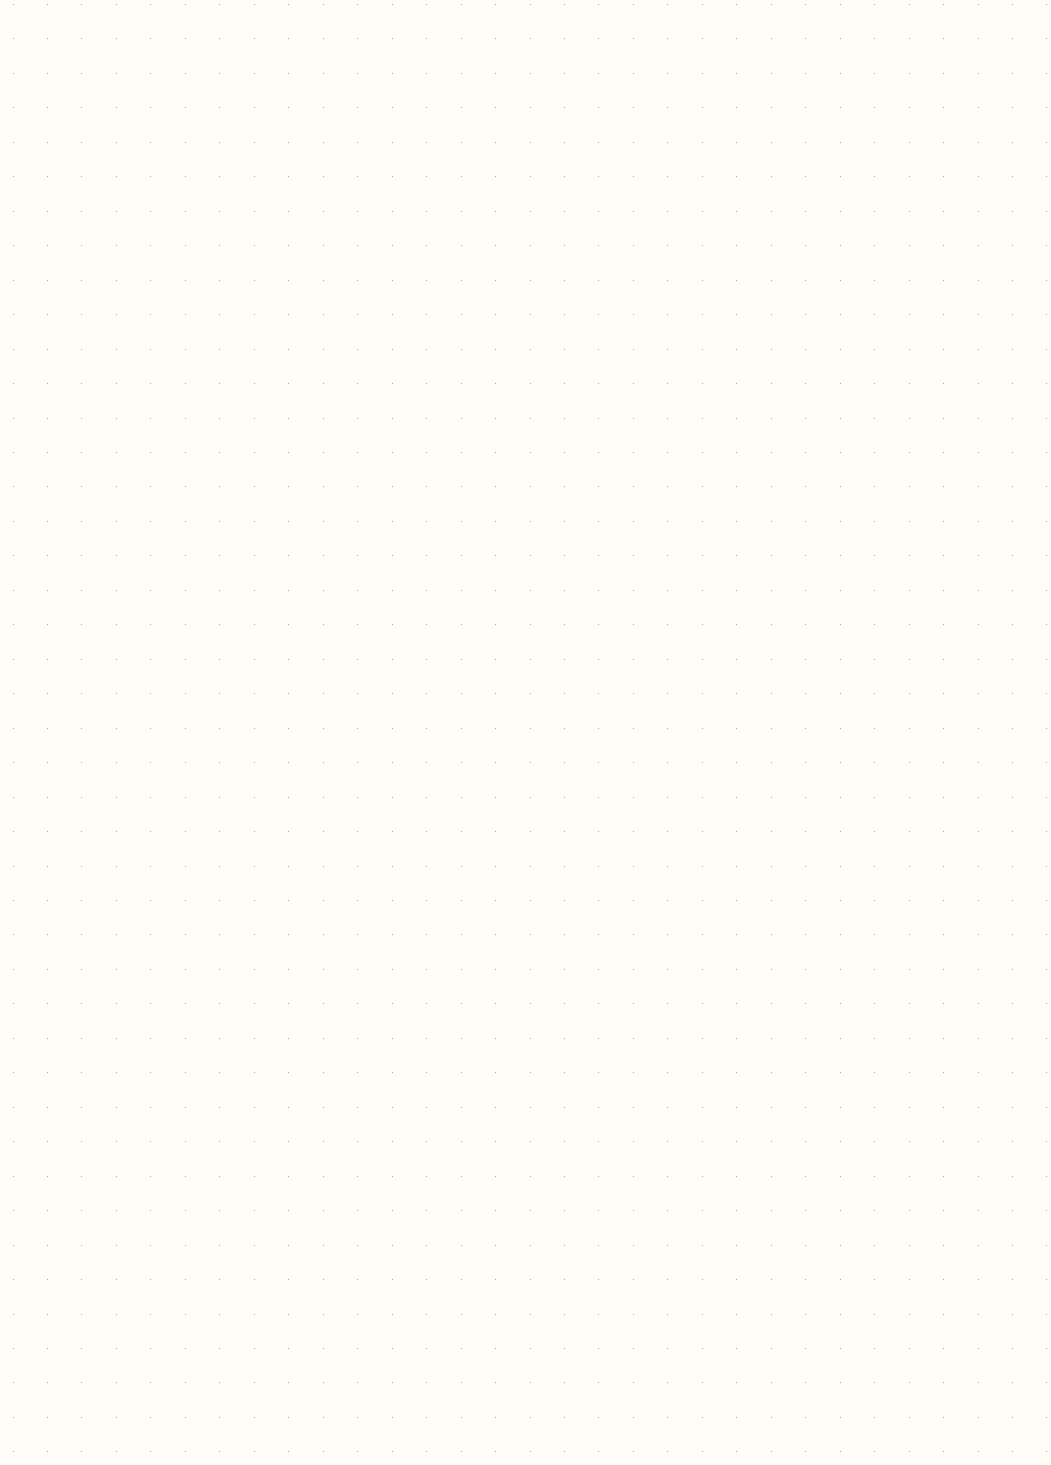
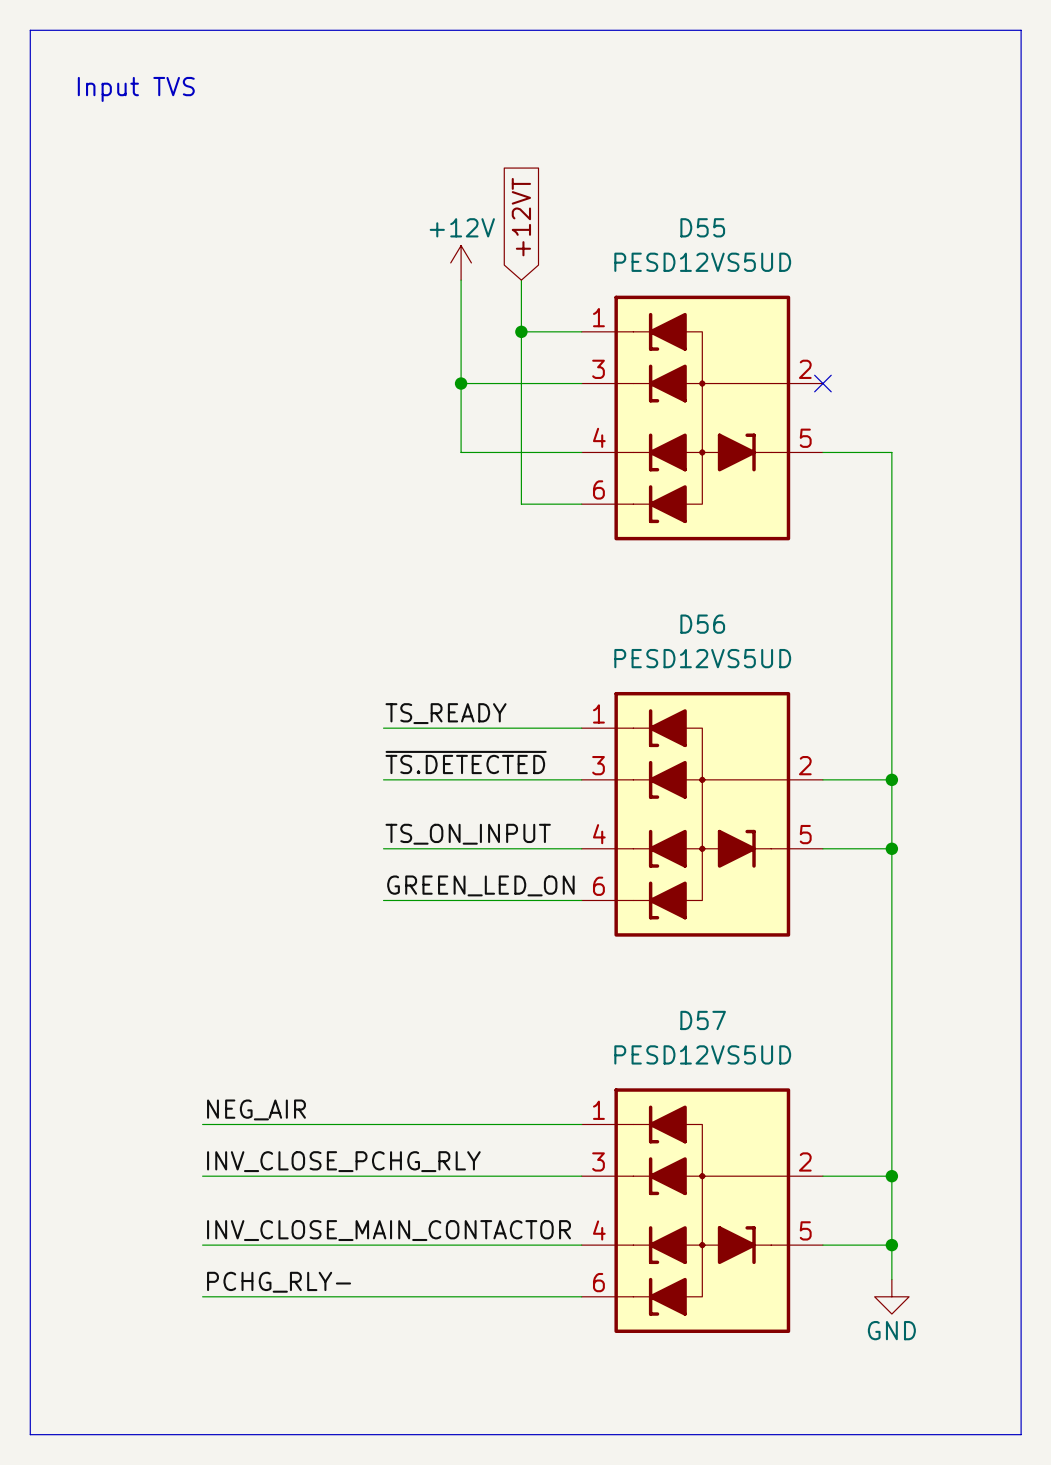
line: none -> (30, 30) (1021, 30) (1021, 1434) (30, 1434) (30, 30)
text: none -> Input TVS (136, 89)
global label: none -> +12VT (521, 217)
power symbol: none -> +12V (461, 262)
wire: none -> (461, 280) (461, 452) (581, 452)
wire: none -> (521, 280) (521, 504) (581, 504)
wire: none -> (521, 331) (581, 331)
junction: none -> (521, 331)
wire: none -> (461, 383) (581, 383)
junction: none -> (461, 383)
no-connect mark: none -> (822, 383)
D55: none -> PESD12VS5UD (702, 418)
wire: none -> (822, 452) (891, 452) (891, 1279)
label: none -> TS_READY (446, 713)
wire: none -> (383, 728) (581, 728)
label: none -> ~{TS.DETECTED} (466, 762)
wire: none -> (383, 779) (581, 779)
wire: none -> (822, 779) (891, 779)
junction: none -> (891, 779)
D56: none -> PESD12VS5UD (702, 814)
label: none -> TS_ON_INPUT (468, 834)
wire: none -> (383, 848) (581, 848)
wire: none -> (822, 848) (891, 848)
junction: none -> (891, 848)
label: none -> GREEN_LED_ON (480, 885)
wire: none -> (383, 900) (581, 900)
label: none -> NEG_AIR (256, 1109)
wire: none -> (202, 1124) (581, 1124)
label: none -> INV_CLOSE_PCHG_RLY (343, 1161)
wire: none -> (202, 1176) (581, 1176)
wire: none -> (822, 1176) (891, 1176)
junction: none -> (891, 1176)
D57: none -> PESD12VS5UD (702, 1210)
label: none -> INV_CLOSE_MAIN_CONTACTOR (389, 1230)
wire: none -> (202, 1245) (581, 1245)
wire: none -> (822, 1245) (891, 1245)
junction: none -> (891, 1245)
label: none -> PCHG_RLY- (279, 1282)
wire: none -> (202, 1296) (581, 1296)
power symbol: none -> GND (891, 1296)

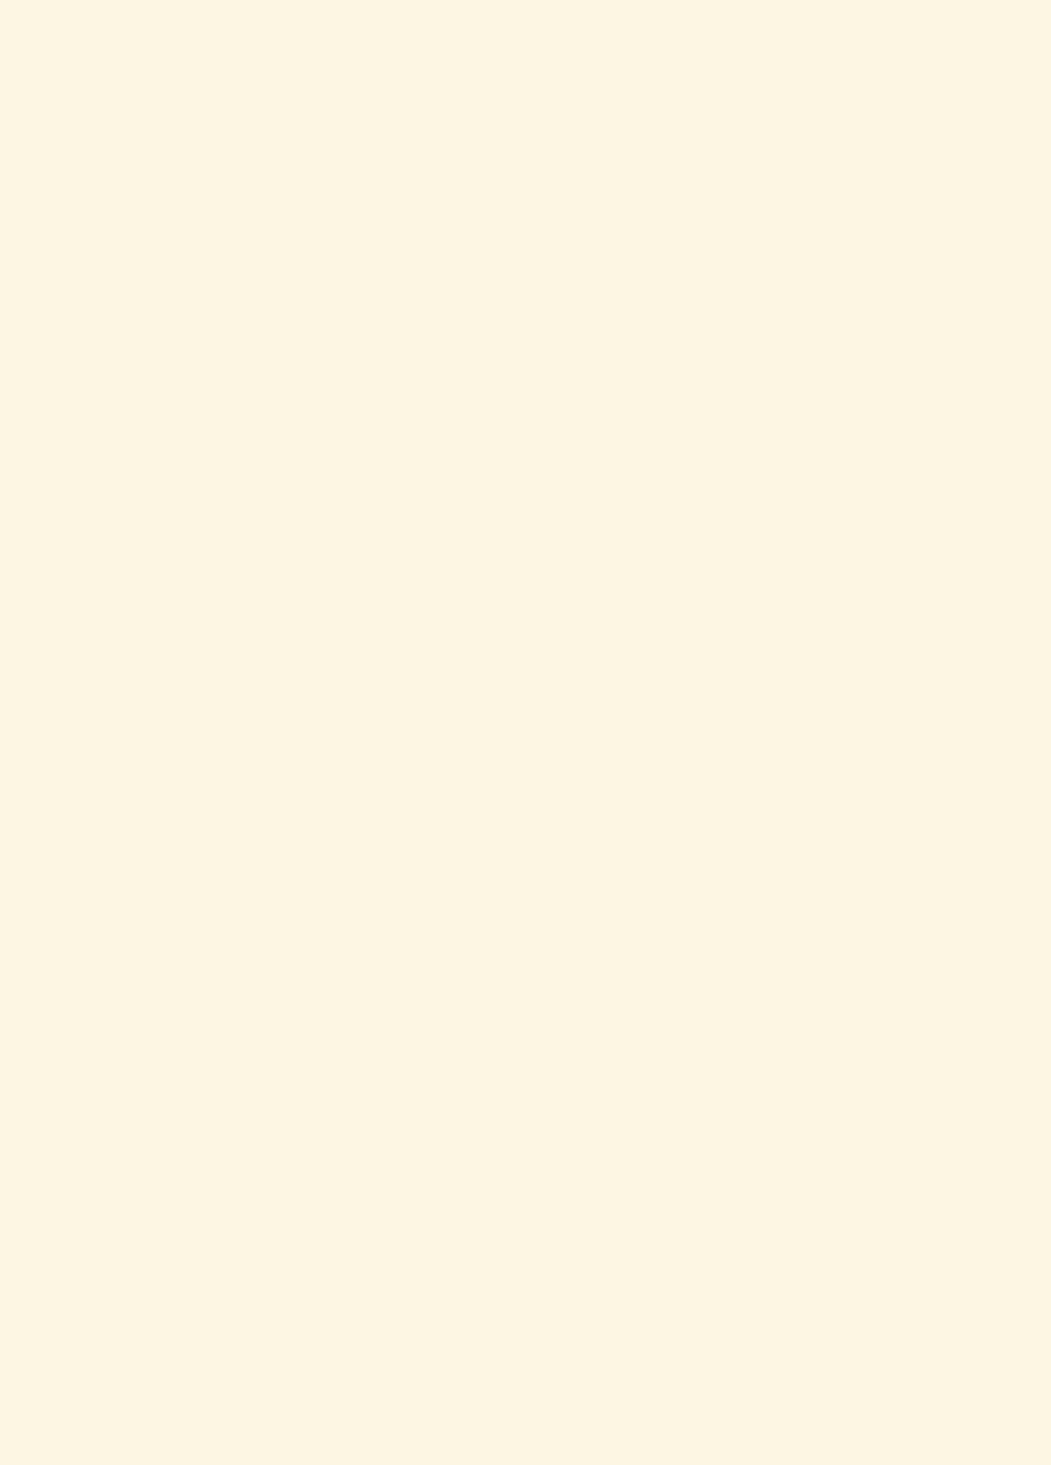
line: (30, 30) (1021, 30) (1021, 1434) (30, 1434) (30, 30) -> none
text: Input TVS (136, 89) -> none
global label: +12VT (521, 217) -> none
power symbol: +12V (461, 262) -> none
wire: (461, 280) (461, 452) (581, 452) -> none
wire: (521, 280) (521, 504) (581, 504) -> none
wire: (521, 331) (581, 331) -> none
junction: (521, 331) -> none
wire: (461, 383) (581, 383) -> none
junction: (461, 383) -> none
no-connect mark: (822, 383) -> none
D55: PESD12VS5UD (702, 418) -> none
wire: (822, 452) (891, 452) (891, 1279) -> none
label: TS_READY (446, 713) -> none
wire: (383, 728) (581, 728) -> none
label: ~{TS.DETECTED} (466, 762) -> none
wire: (383, 779) (581, 779) -> none
wire: (822, 779) (891, 779) -> none
junction: (891, 779) -> none
D56: PESD12VS5UD (702, 814) -> none
label: TS_ON_INPUT (468, 834) -> none
wire: (383, 848) (581, 848) -> none
wire: (822, 848) (891, 848) -> none
junction: (891, 848) -> none
label: GREEN_LED_ON (480, 885) -> none
wire: (383, 900) (581, 900) -> none
label: NEG_AIR (256, 1109) -> none
wire: (202, 1124) (581, 1124) -> none
label: INV_CLOSE_PCHG_RLY (343, 1161) -> none
wire: (202, 1176) (581, 1176) -> none
wire: (822, 1176) (891, 1176) -> none
junction: (891, 1176) -> none
D57: PESD12VS5UD (702, 1210) -> none
label: INV_CLOSE_MAIN_CONTACTOR (389, 1230) -> none
wire: (202, 1245) (581, 1245) -> none
wire: (822, 1245) (891, 1245) -> none
junction: (891, 1245) -> none
label: PCHG_RLY- (279, 1282) -> none
wire: (202, 1296) (581, 1296) -> none
power symbol: GND (891, 1296) -> none

